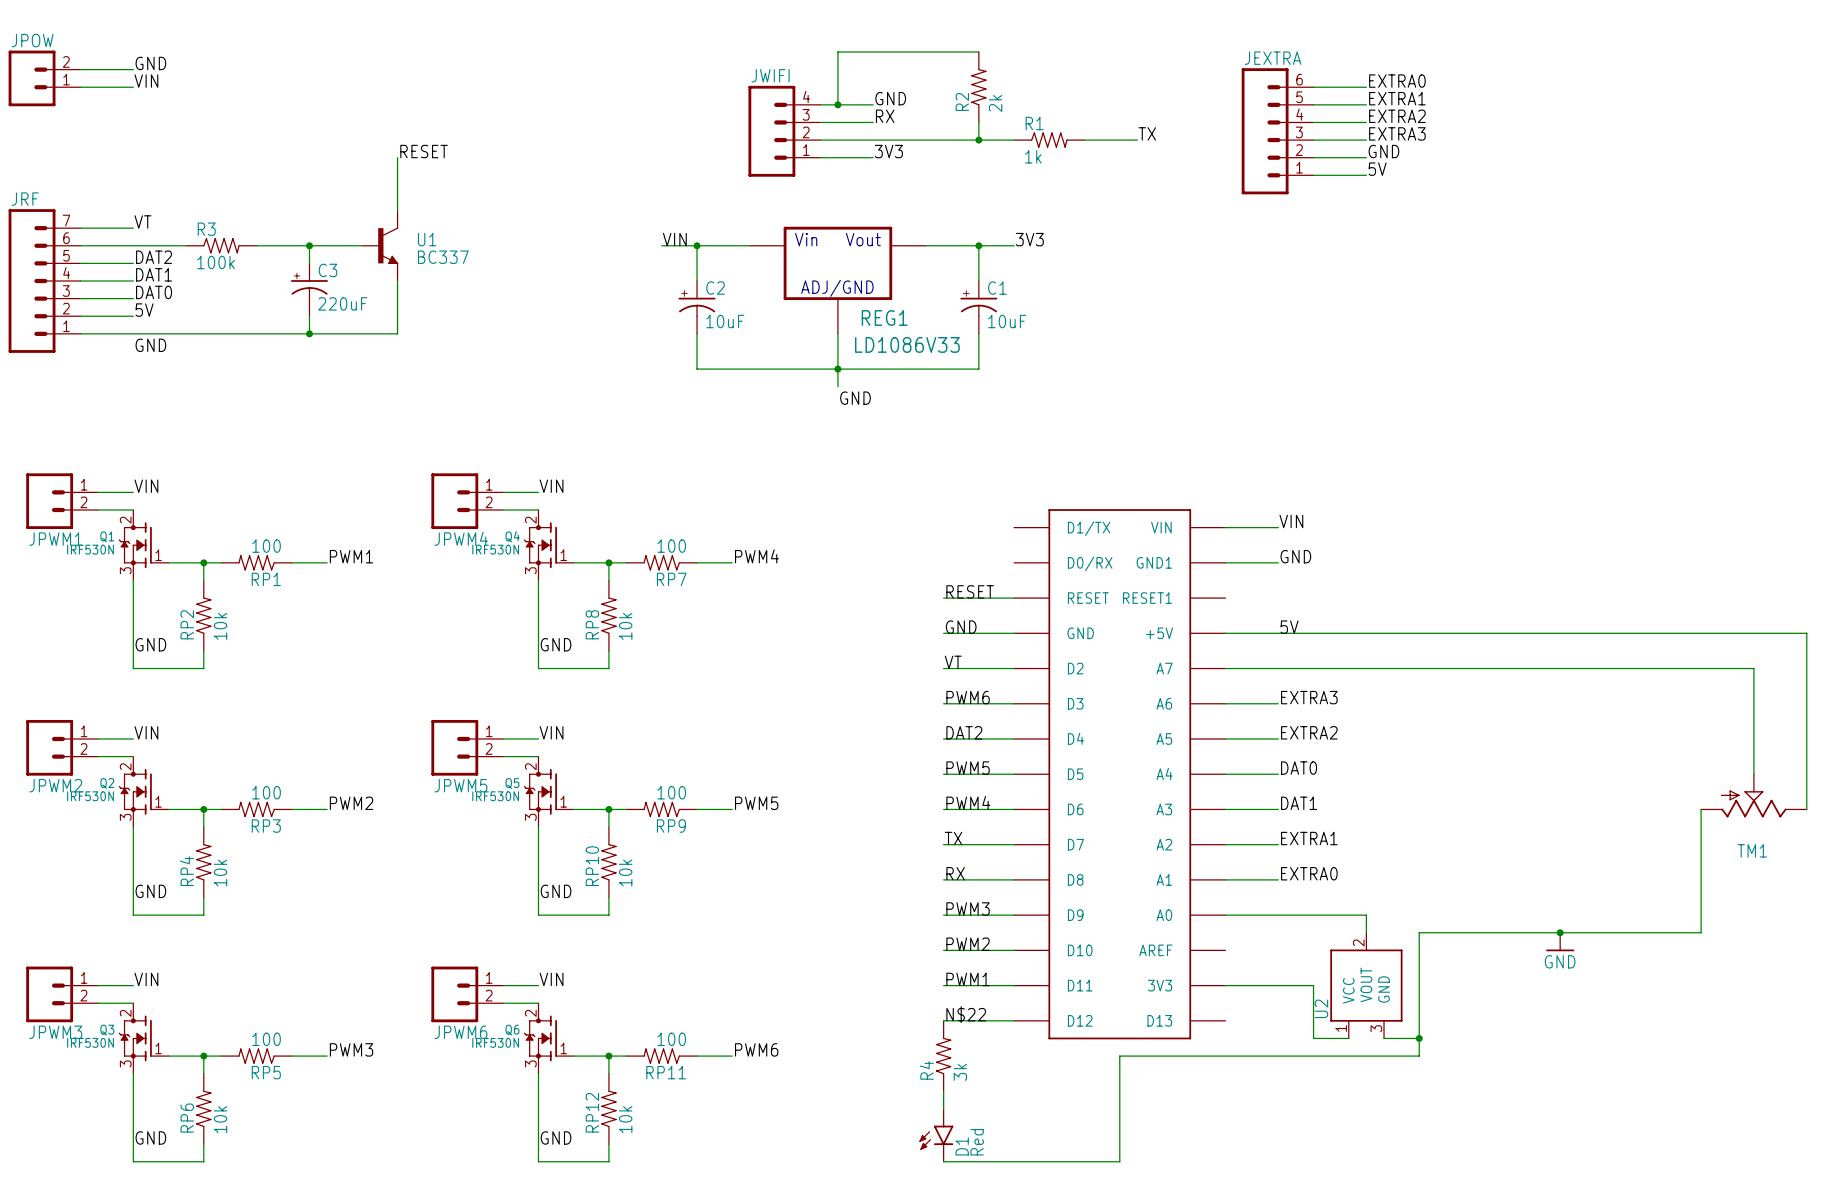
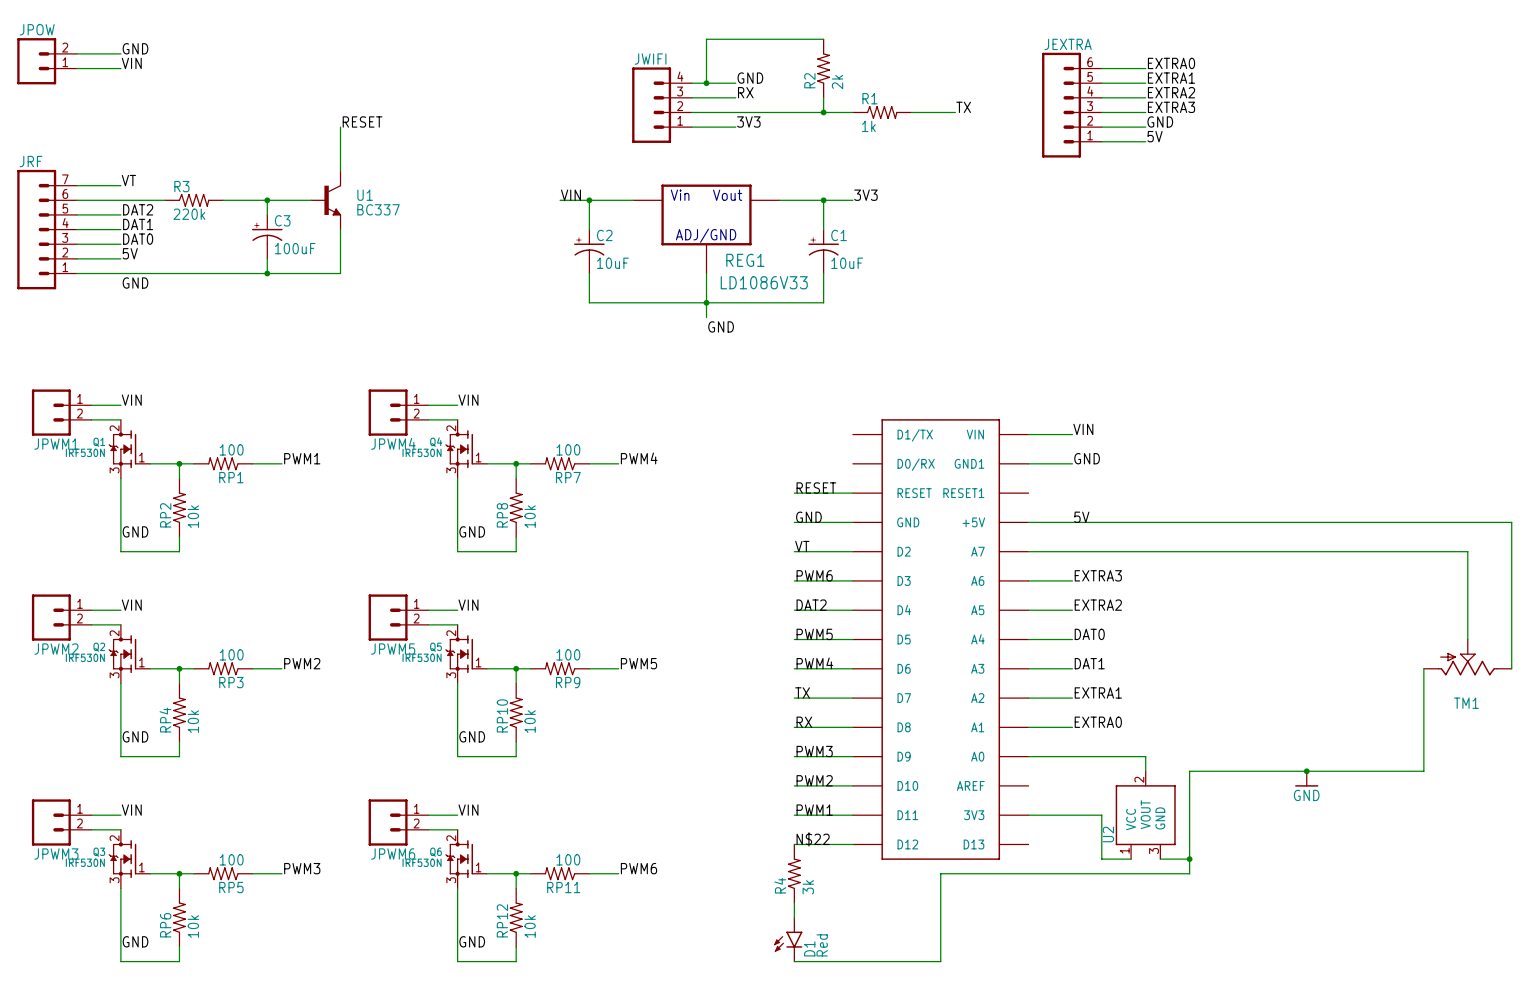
R3 value: 100k (215, 262) -> 220k (189, 214)
C3 value: 220uF (342, 303) -> 100uF (295, 248)

